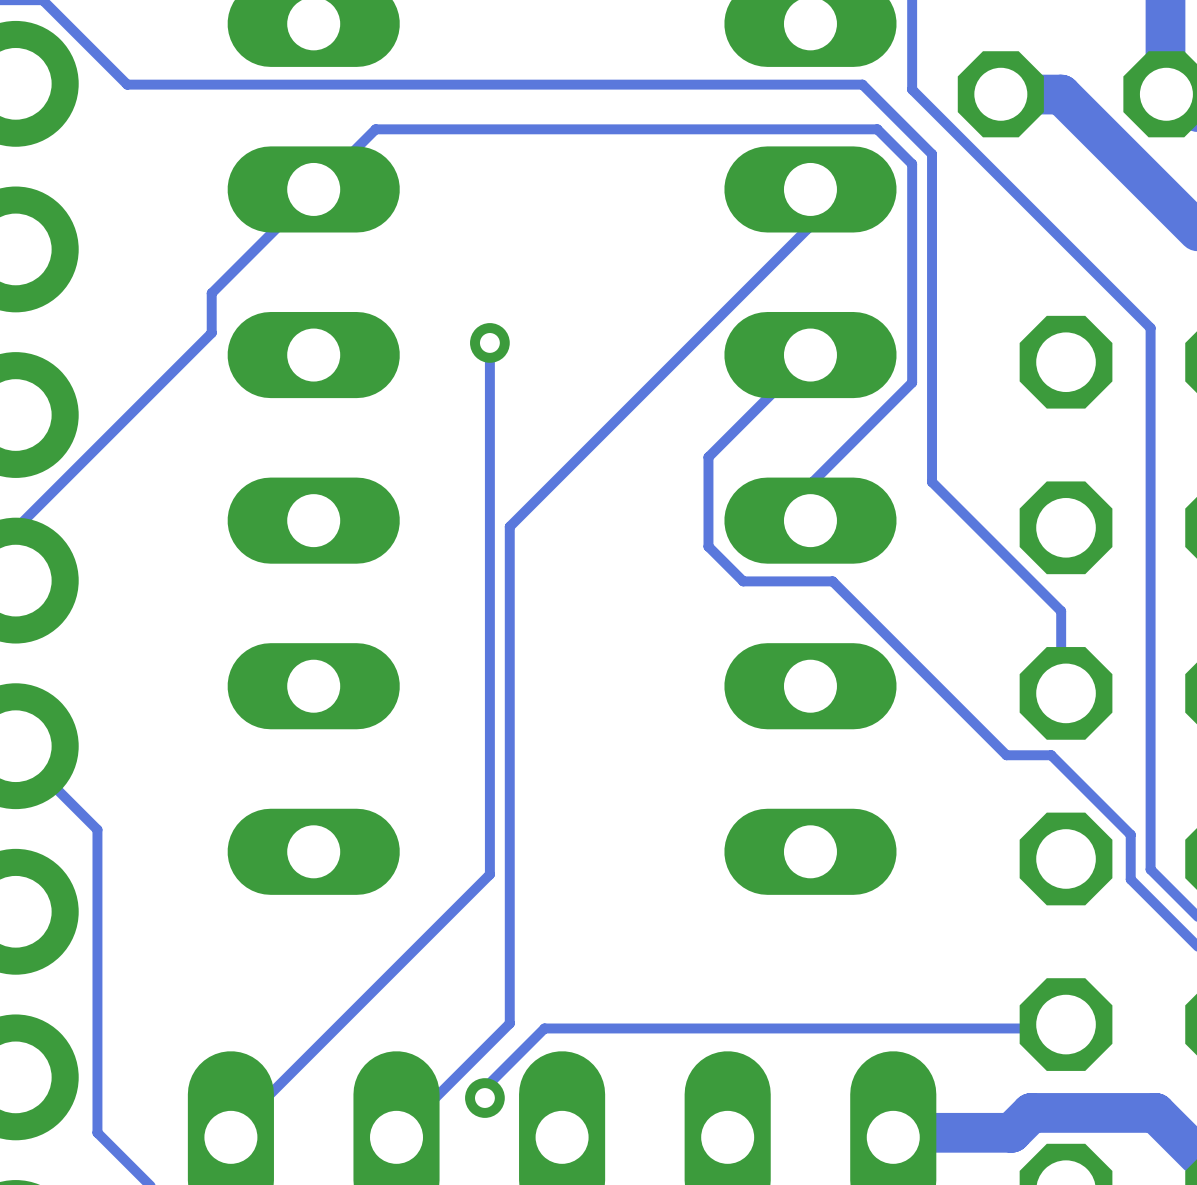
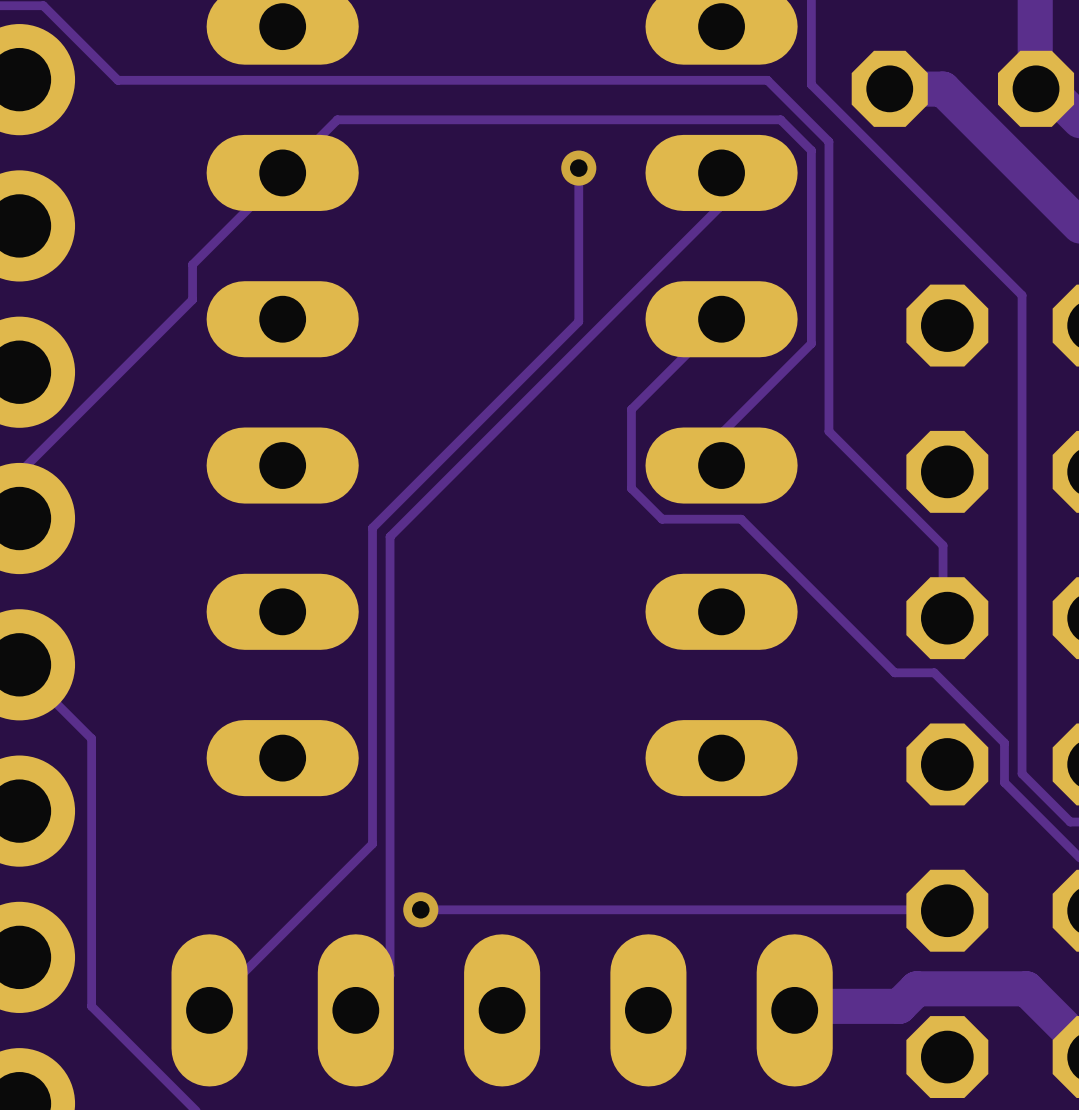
track: (489, 342) (489, 874) (415, 949) -> (578, 168) (578, 321) (372, 527) (372, 843)
via position: (489, 342) -> (578, 168)
track: (509, 526) (509, 1023) (435, 1098) -> (455, 470) (390, 536) (390, 975)
track: (1066, 1024) (1061, 1028) (544, 1028) (484, 1088) (484, 1098) -> (947, 910) (420, 909)
via position: (484, 1098) -> (420, 909)

